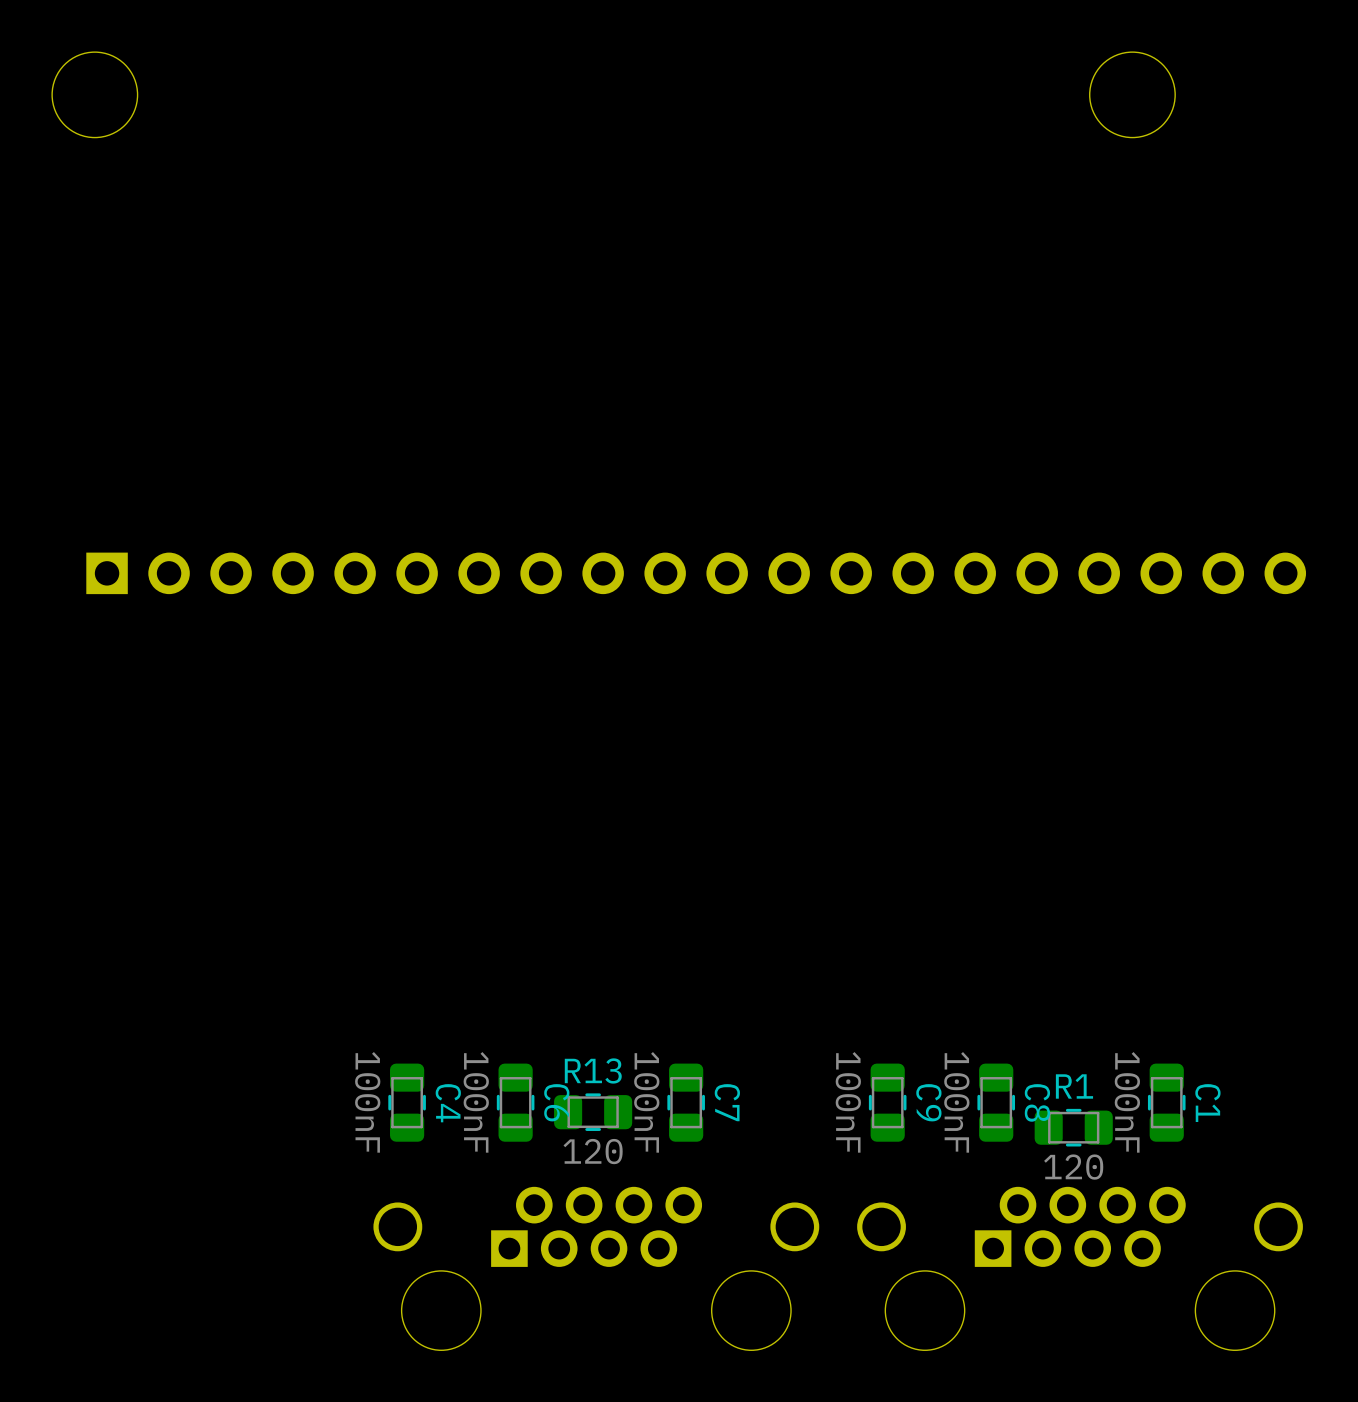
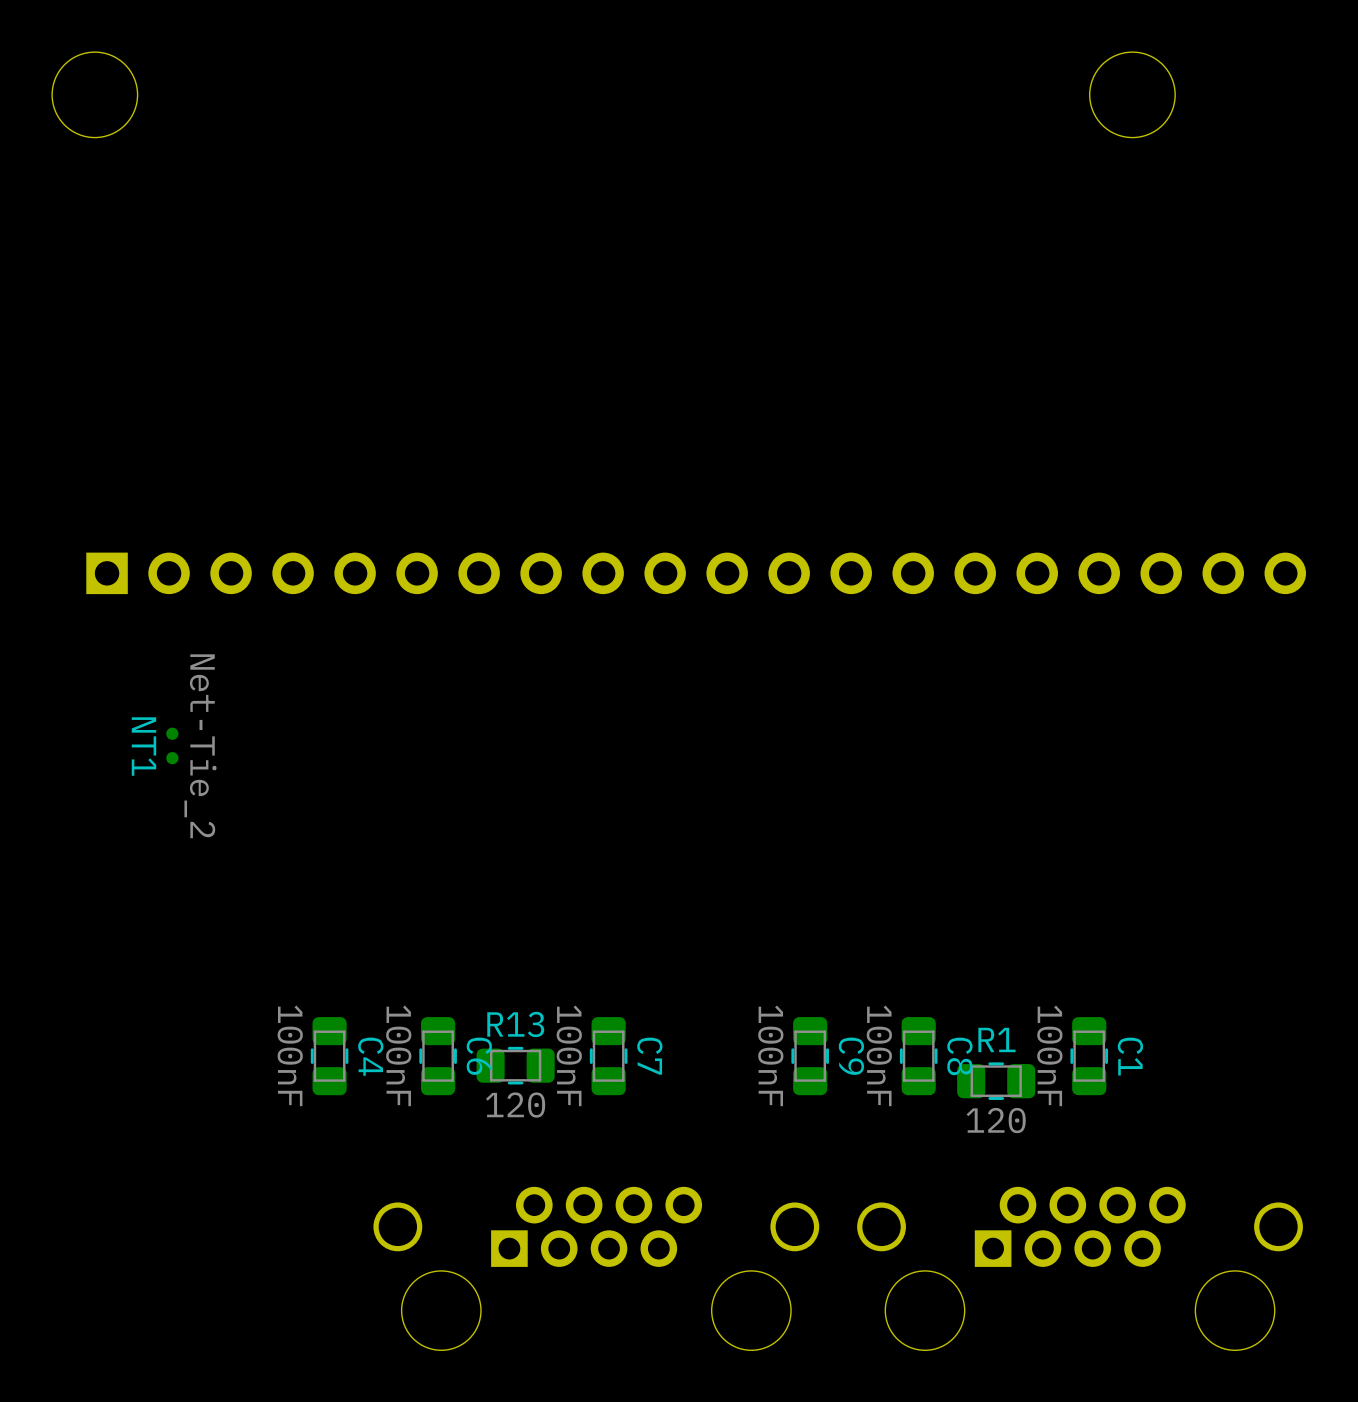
NT1: none -> Net-Tie_2 (172, 745)
C4 position: (407, 1102) -> (329, 1056)
C6 position: (515, 1102) -> (438, 1056)
C7 position: (686, 1102) -> (608, 1056)
C9 position: (887, 1102) -> (810, 1056)
C8 position: (996, 1102) -> (918, 1056)
C1 position: (1166, 1102) -> (1089, 1056)
R13 position: (593, 1112) -> (515, 1065)
R1 position: (1073, 1127) -> (996, 1081)

